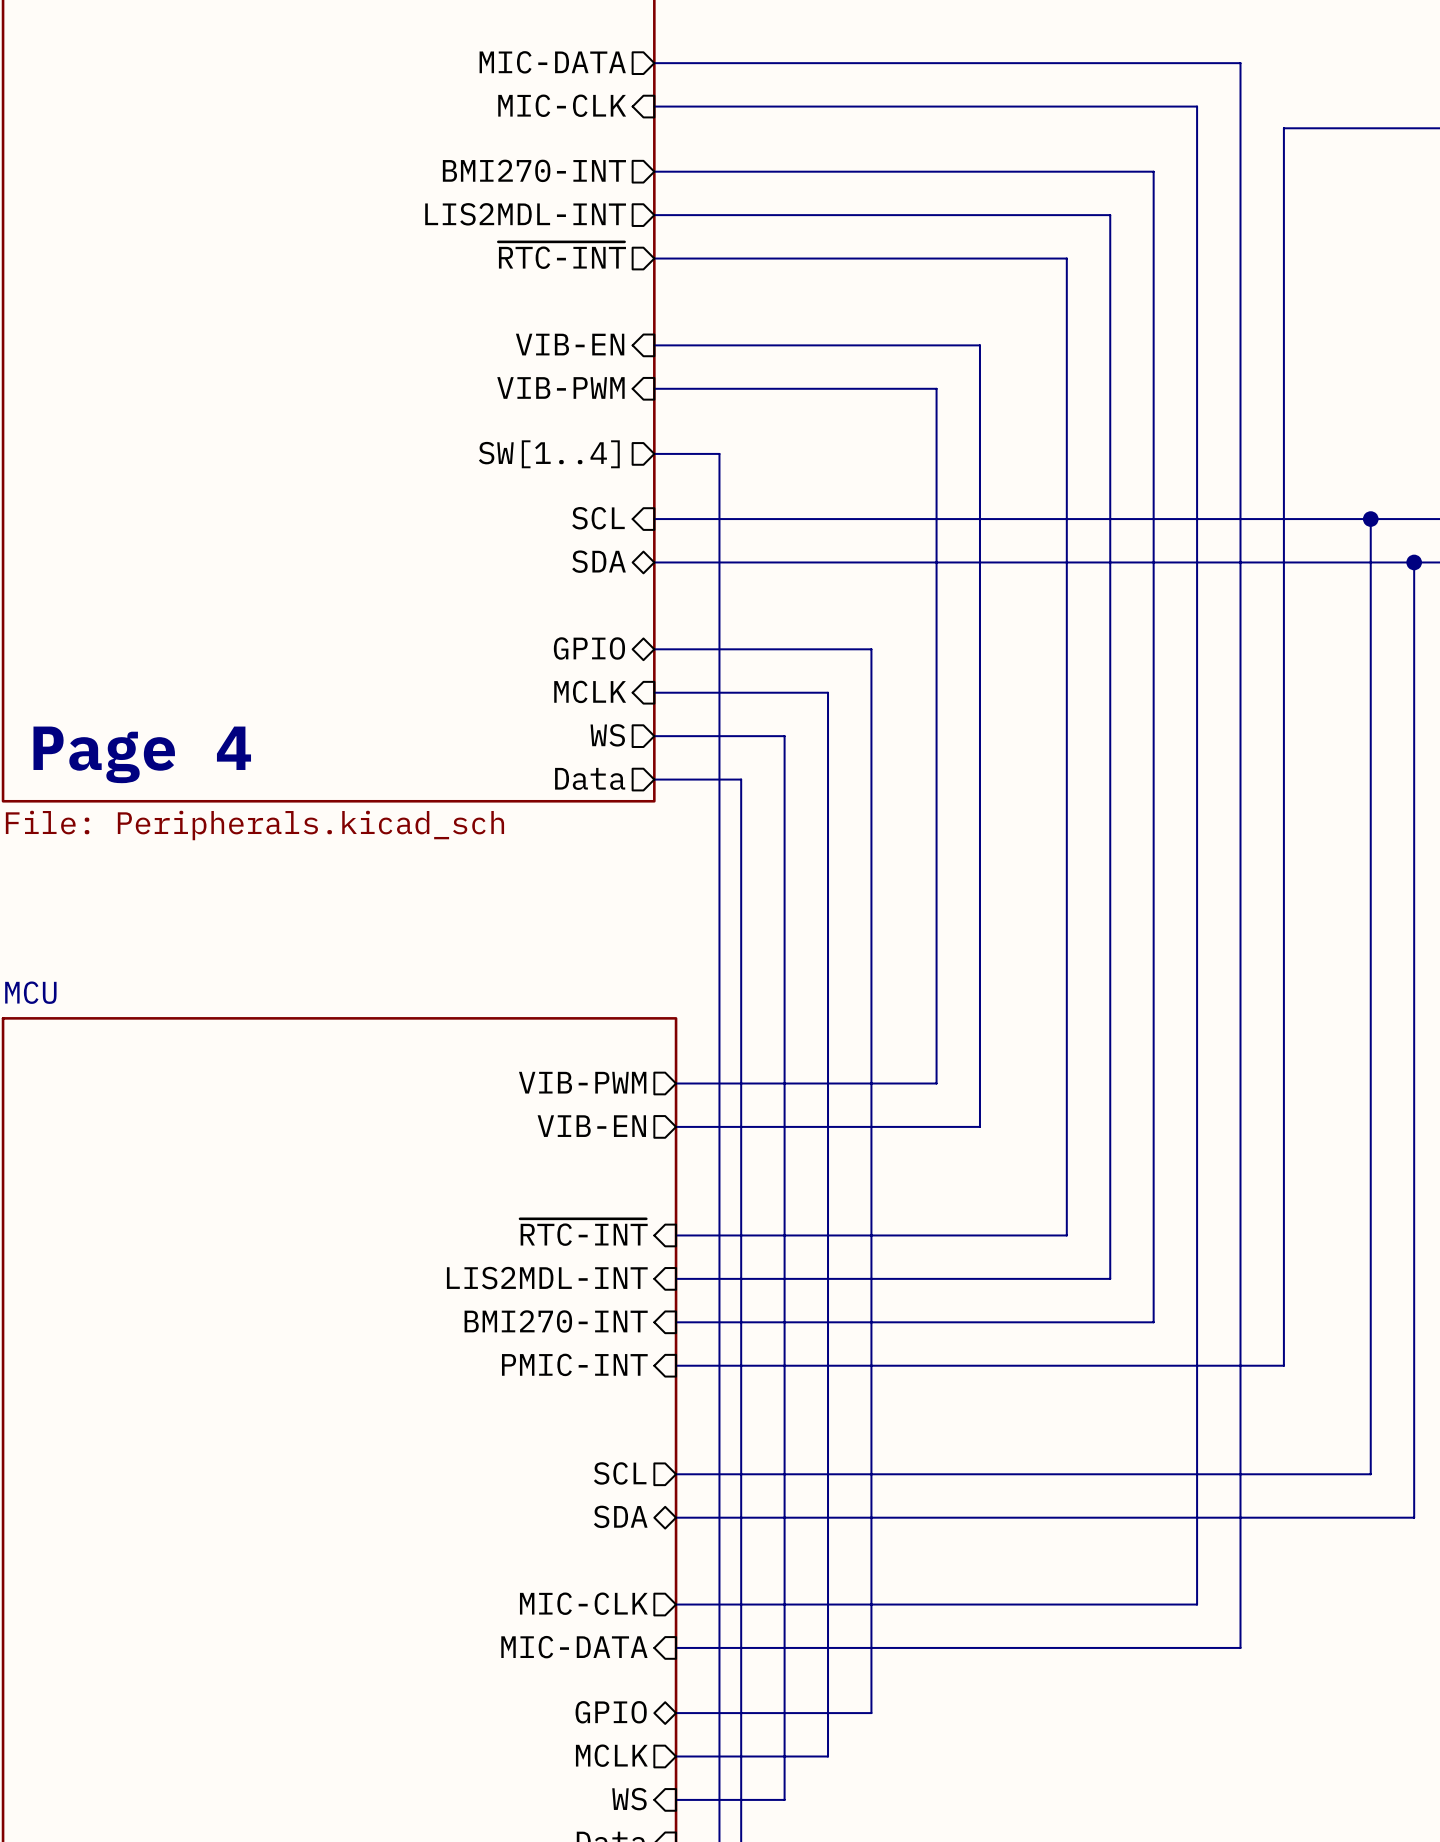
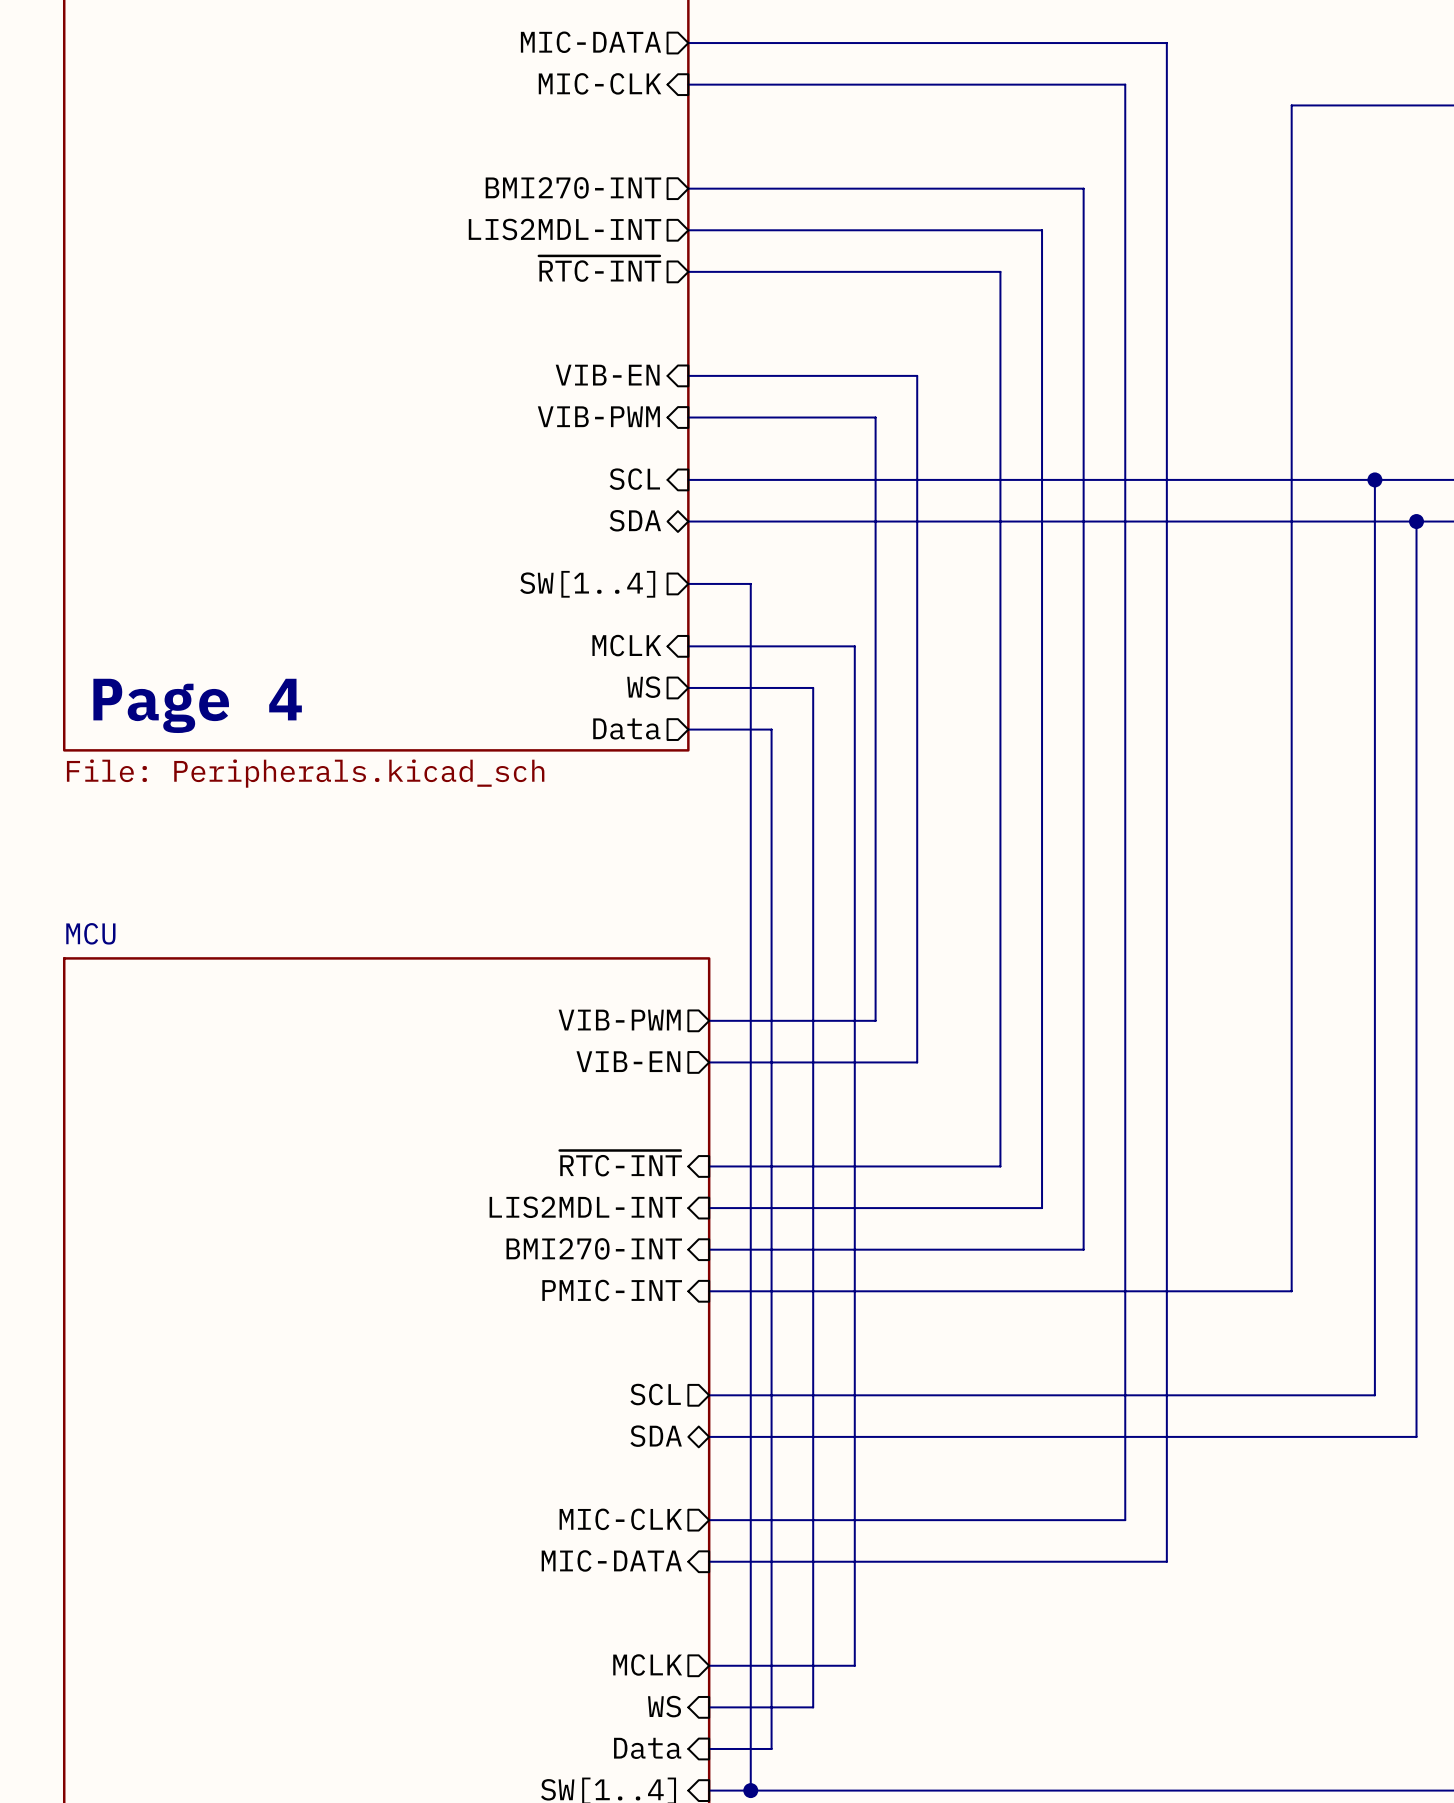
wire: (1153, 63) (1240, 63) (1240, 1647) (1153, 1647) -> none
wire: (1110, 106) (1197, 106) (1197, 1604) (1110, 1604) -> (1125, 84) (1125, 188)
sheet pin: BMI270-INT (534, 170) -> none
wire: (654, 171) (1153, 171) -> (1166, 43) (1166, 147)
sheet pin: LIS2MDL-INT (525, 214) -> BMI270-INT (573, 187)
wire: (1066, 215) (1110, 215) -> (1083, 188) (1083, 230)
sheet pin: ~{RTC-INT} (562, 255) -> LIS2MDL-INT (564, 229)
wire: (1023, 258) (1066, 258) -> (1042, 230) (1042, 1208)
sheet pin: none -> ~{RTC-INT} (600, 268)
sheet pin position: VIB-EN (570, 344) -> VIB-EN (607, 375)
wire: (654, 345) (979, 345) -> (688, 271) (1000, 271) (1000, 313)
sheet pin: VIB-PWM (560, 387) -> none
wire: (654, 388) (936, 388) (936, 1083) (849, 1083) -> (688, 417) (875, 417) (875, 1020)
wire: none -> (688, 375) (917, 375) (917, 1062)
bus: (654, 453) (719, 453) (719, 627) -> (688, 583) (750, 583)
sheet pin shape: output (549, 454) -> input (598, 416)
sheet pin: SW[1..4] (549, 454) -> VIB-PWM (598, 416)
sheet pin: none -> SW[1..4] (587, 584)
sheet pin: GPIO (589, 648) -> none
wire: (654, 649) (871, 649) (871, 1713) (676, 1713) -> none
wire: (893, 1126) (979, 1126) -> (1000, 1166) (1000, 1062)
wire: (979, 1235) (1066, 1235) -> (1083, 1249) (1083, 1166)
wire: (1023, 1278) (1110, 1278) -> (1125, 1520) (1125, 1208)
wire: (1066, 1322) (1153, 1322) -> (1166, 1561) (1166, 1249)
sheet pin: GPIO (611, 1712) -> none

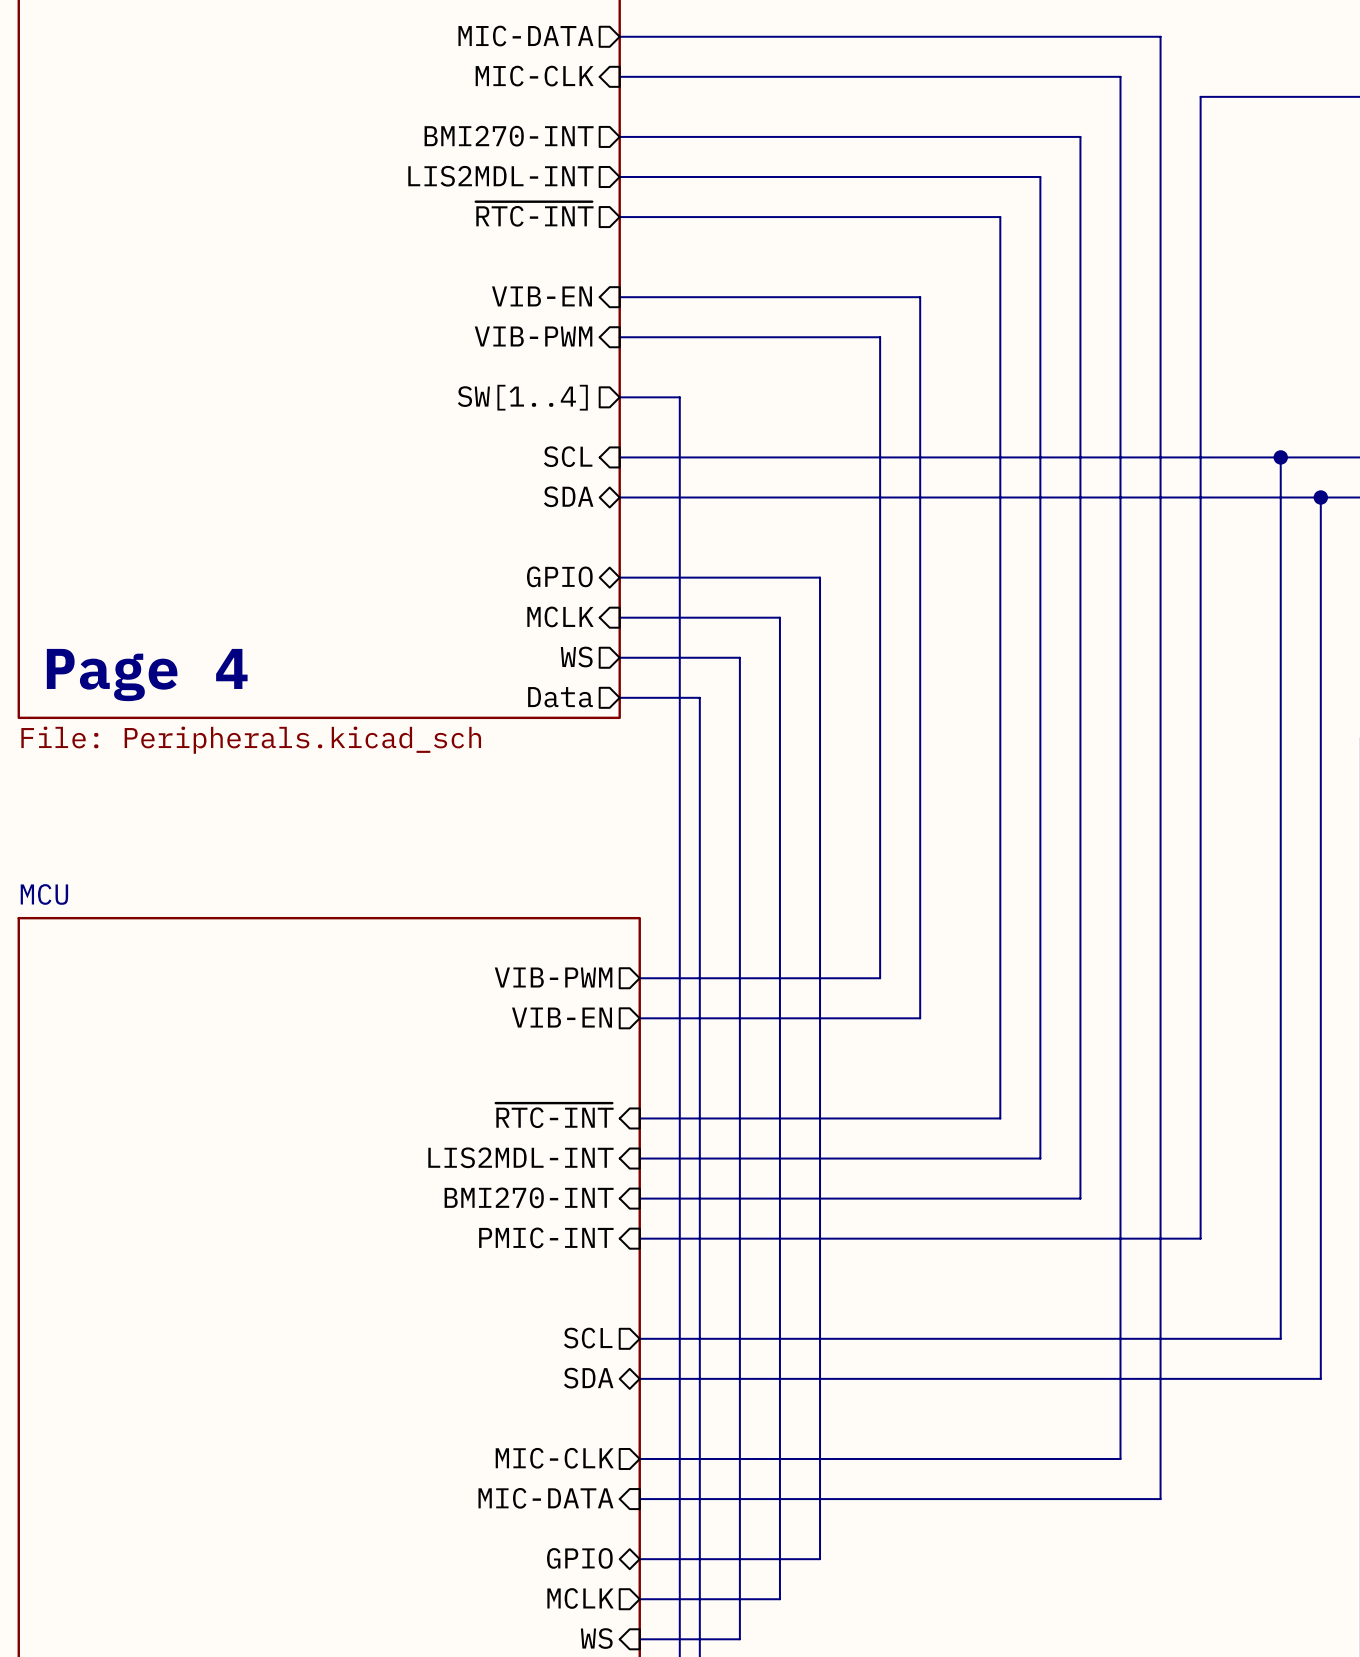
wire: (1166, 43) (1166, 147) -> (619, 136) (1080, 136)
wire: none -> (1080, 36) (1160, 36) (1160, 1499) (1080, 1499)
wire: (1125, 84) (1125, 188) -> (1040, 76) (1120, 76) (1120, 1459) (1040, 1459)
sheet pin: none -> BMI270-INT (509, 136)
sheet pin: BMI270-INT (573, 187) -> LIS2MDL-INT (500, 176)
wire: (1083, 188) (1083, 230) -> (1000, 176) (1040, 176)
sheet pin: LIS2MDL-INT (564, 229) -> ~{RTC-INT} (534, 214)
wire: (1042, 230) (1042, 1208) -> (960, 217) (1000, 217)
sheet pin: ~{RTC-INT} (600, 268) -> none
wire: (688, 271) (1000, 271) (1000, 313) -> (619, 297) (920, 297)
sheet pin: none -> VIB-PWM (533, 336)
sheet pin position: VIB-EN (607, 375) -> VIB-EN (541, 296)
wire: (688, 375) (917, 375) (917, 1062) -> none
sheet pin shape: input (598, 416) -> output (522, 397)
sheet pin: VIB-PWM (598, 416) -> SW[1..4] (522, 397)
wire: (688, 417) (875, 417) (875, 1020) -> (619, 337) (880, 337) (880, 978) (799, 978)
bus: (688, 583) (750, 583) -> (619, 397) (679, 397) (679, 557)
sheet pin: SW[1..4] (587, 584) -> none
sheet pin: none -> GPIO (559, 576)
wire: none -> (619, 577) (820, 577) (820, 1559) (639, 1559)
wire: (1000, 1062) (1000, 1166) -> (920, 1018) (840, 1018)
wire: (1083, 1166) (1083, 1249) -> (1000, 1118) (920, 1118)
wire: (1125, 1208) (1125, 1520) -> (1040, 1158) (960, 1158)
wire: (1166, 1249) (1166, 1561) -> (1080, 1198) (1000, 1198)
sheet pin: none -> GPIO (579, 1558)

